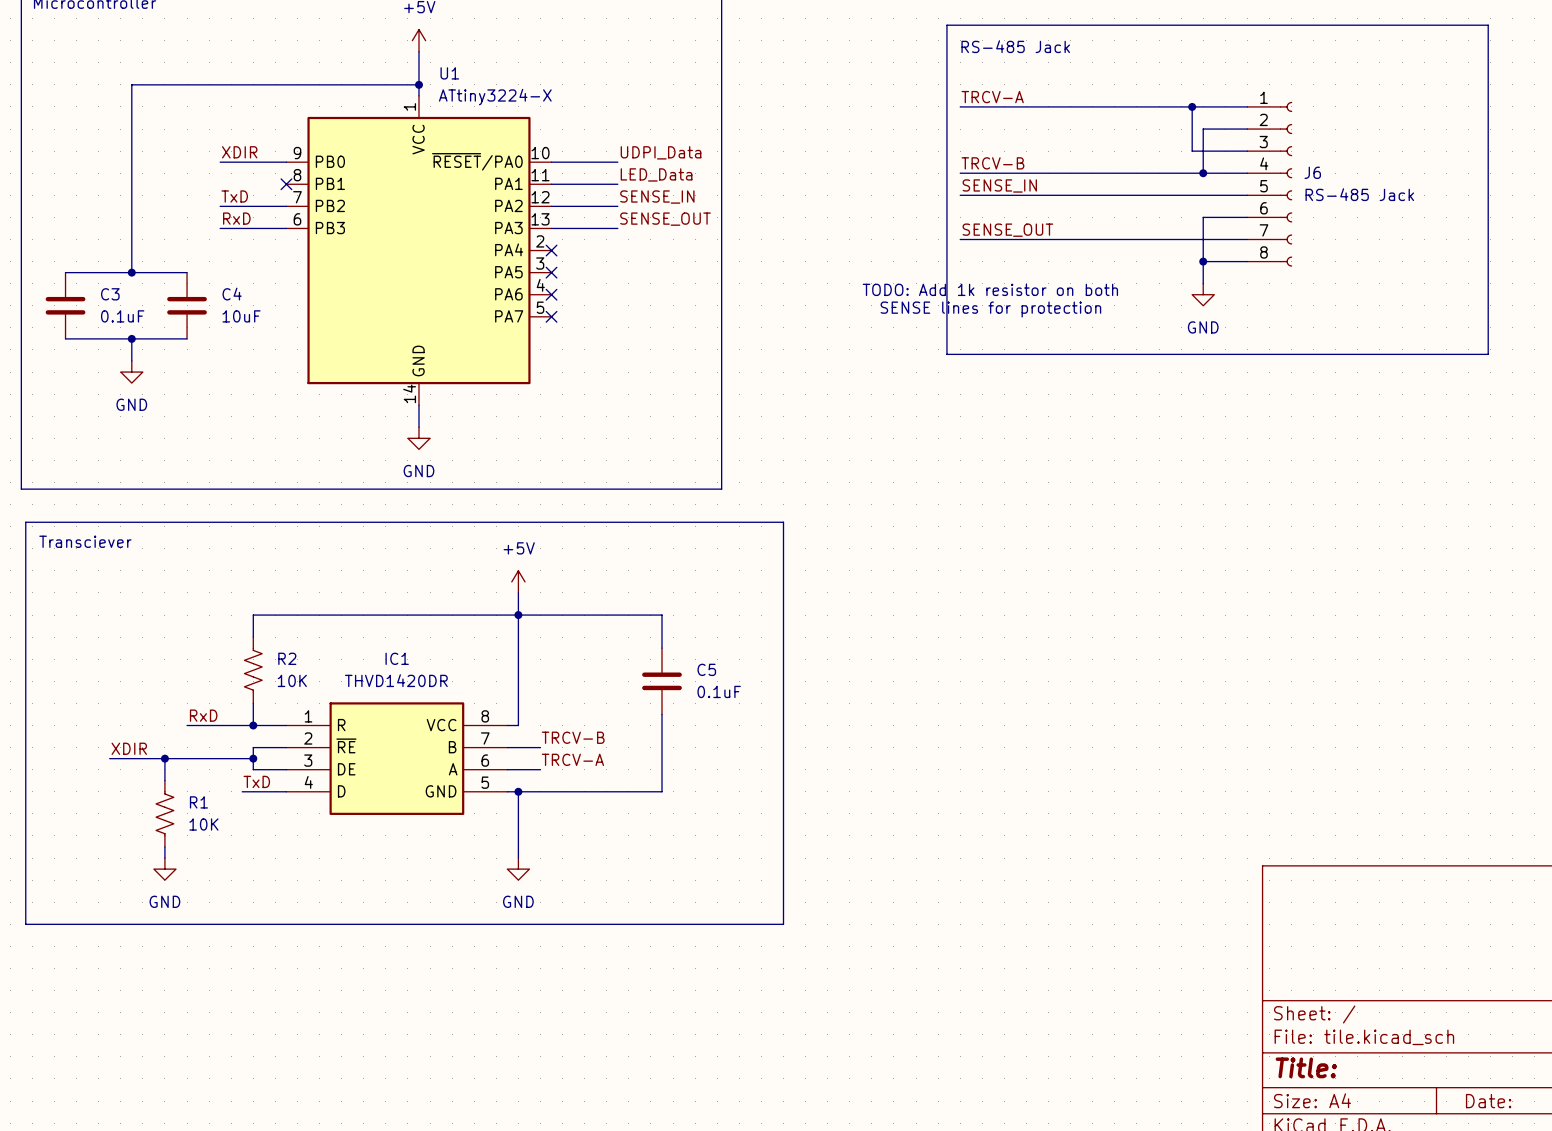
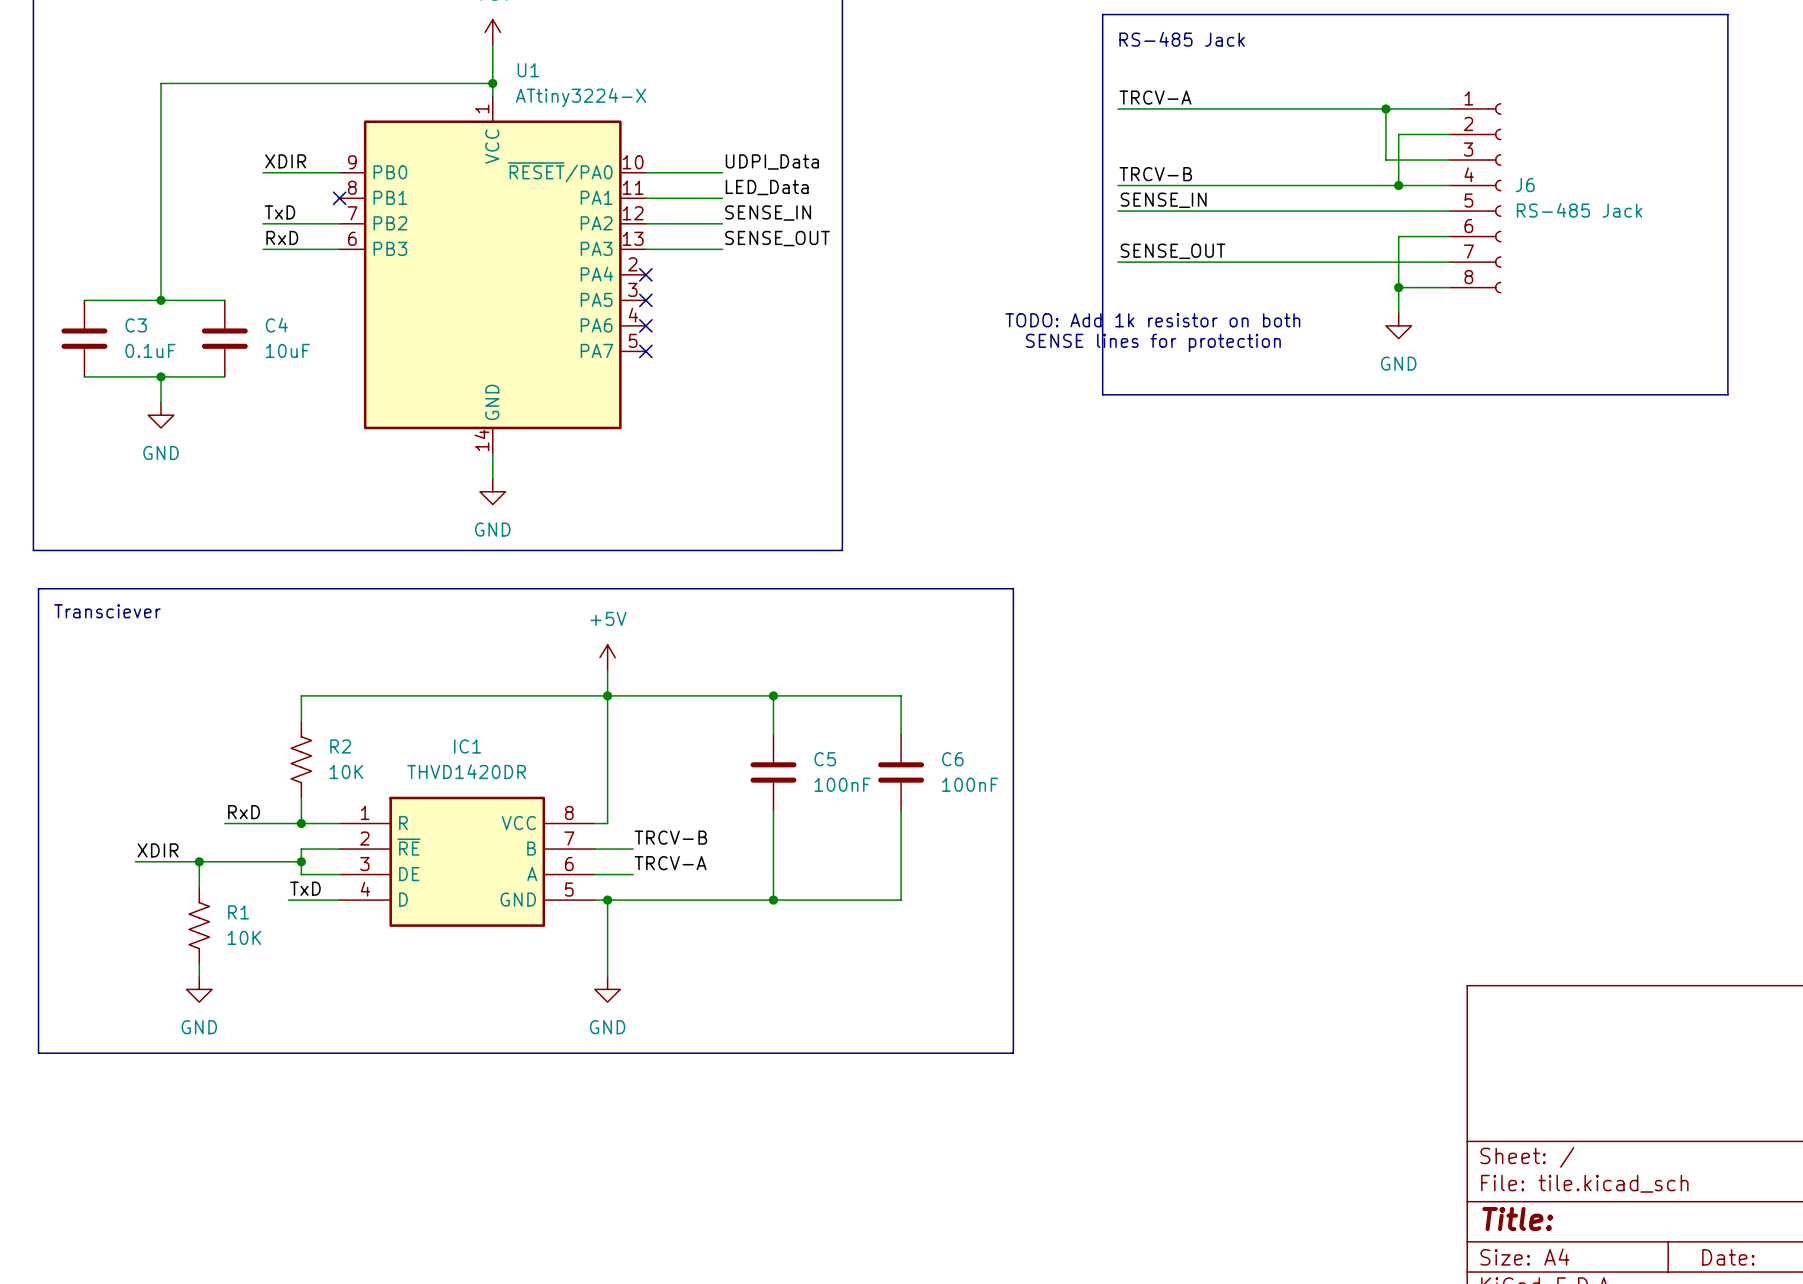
line: (783, 522) (783, 924) -> (913, 588) (1013, 588) (1013, 1053) (913, 1053)
wire: none -> (773, 695) (901, 695) (901, 734)
junction: none -> (773, 695)
C6: none -> 100nF (901, 772)
C5 value: 0.1uF (719, 691) -> 100nF (842, 784)
wire: none -> (901, 810) (901, 900) (773, 900)
junction: none -> (773, 900)

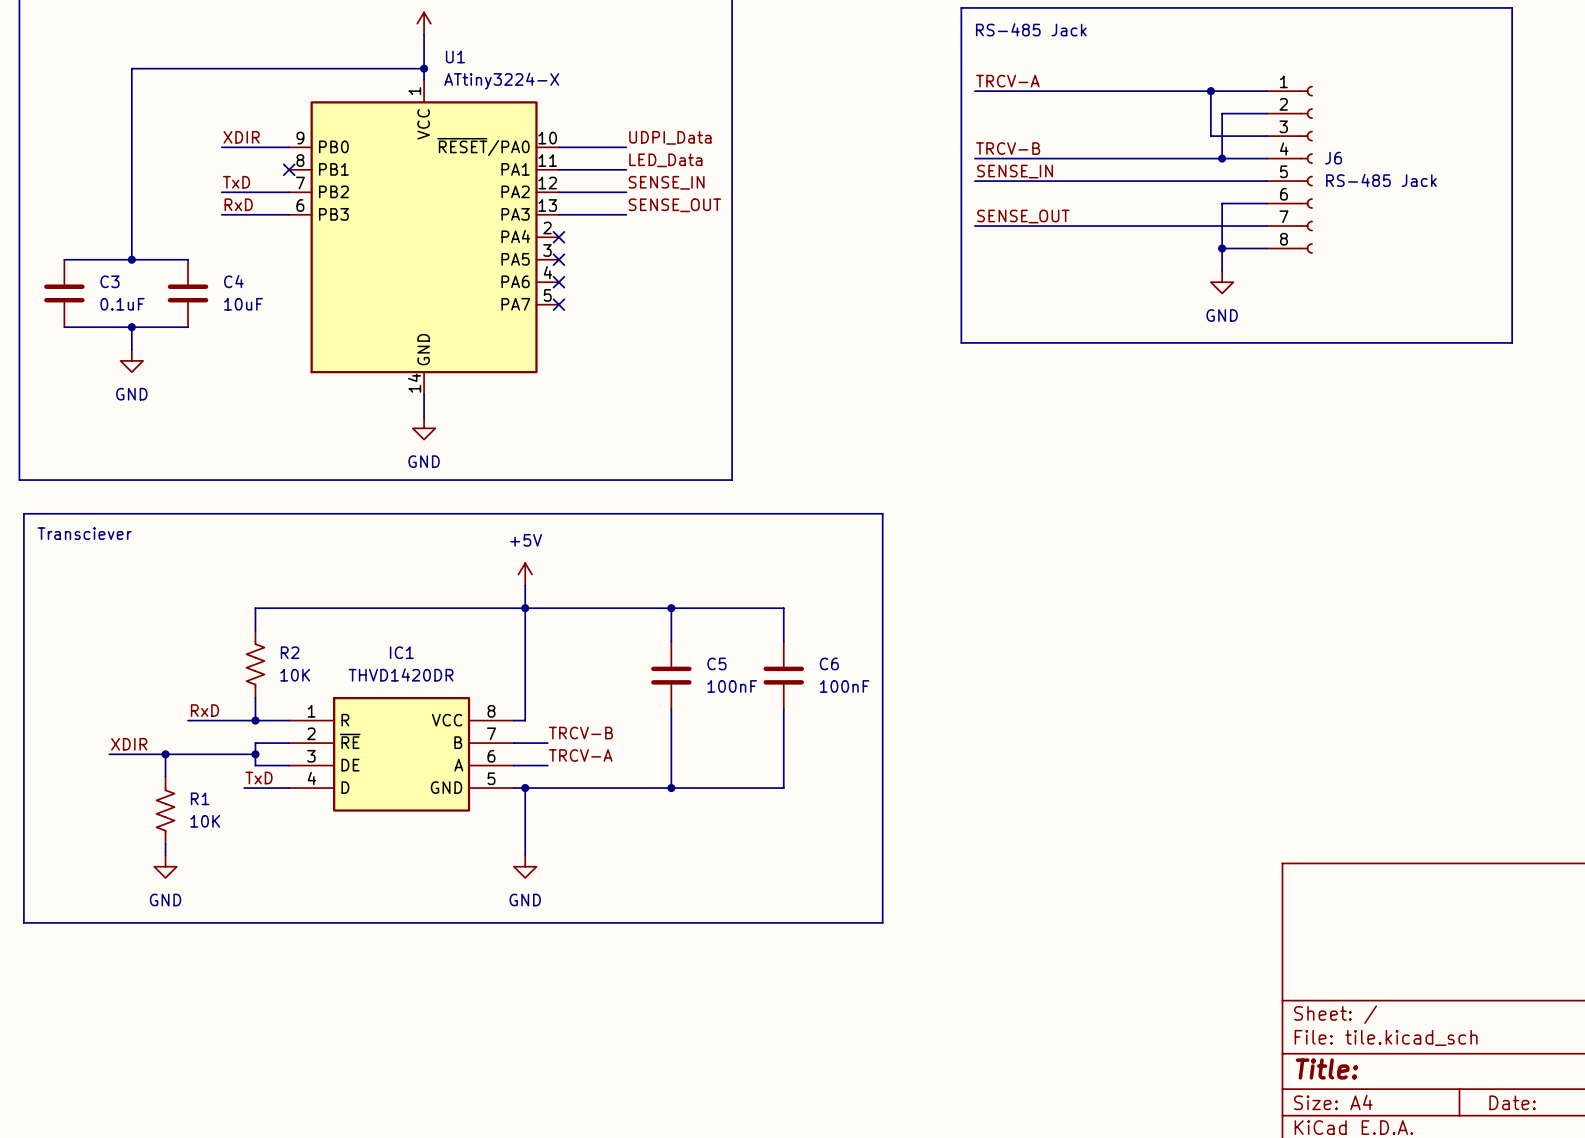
text: TODO: Add 1k resistor on both (1152, 320) -> none
text: SENSE lines for protection (1153, 342) -> none

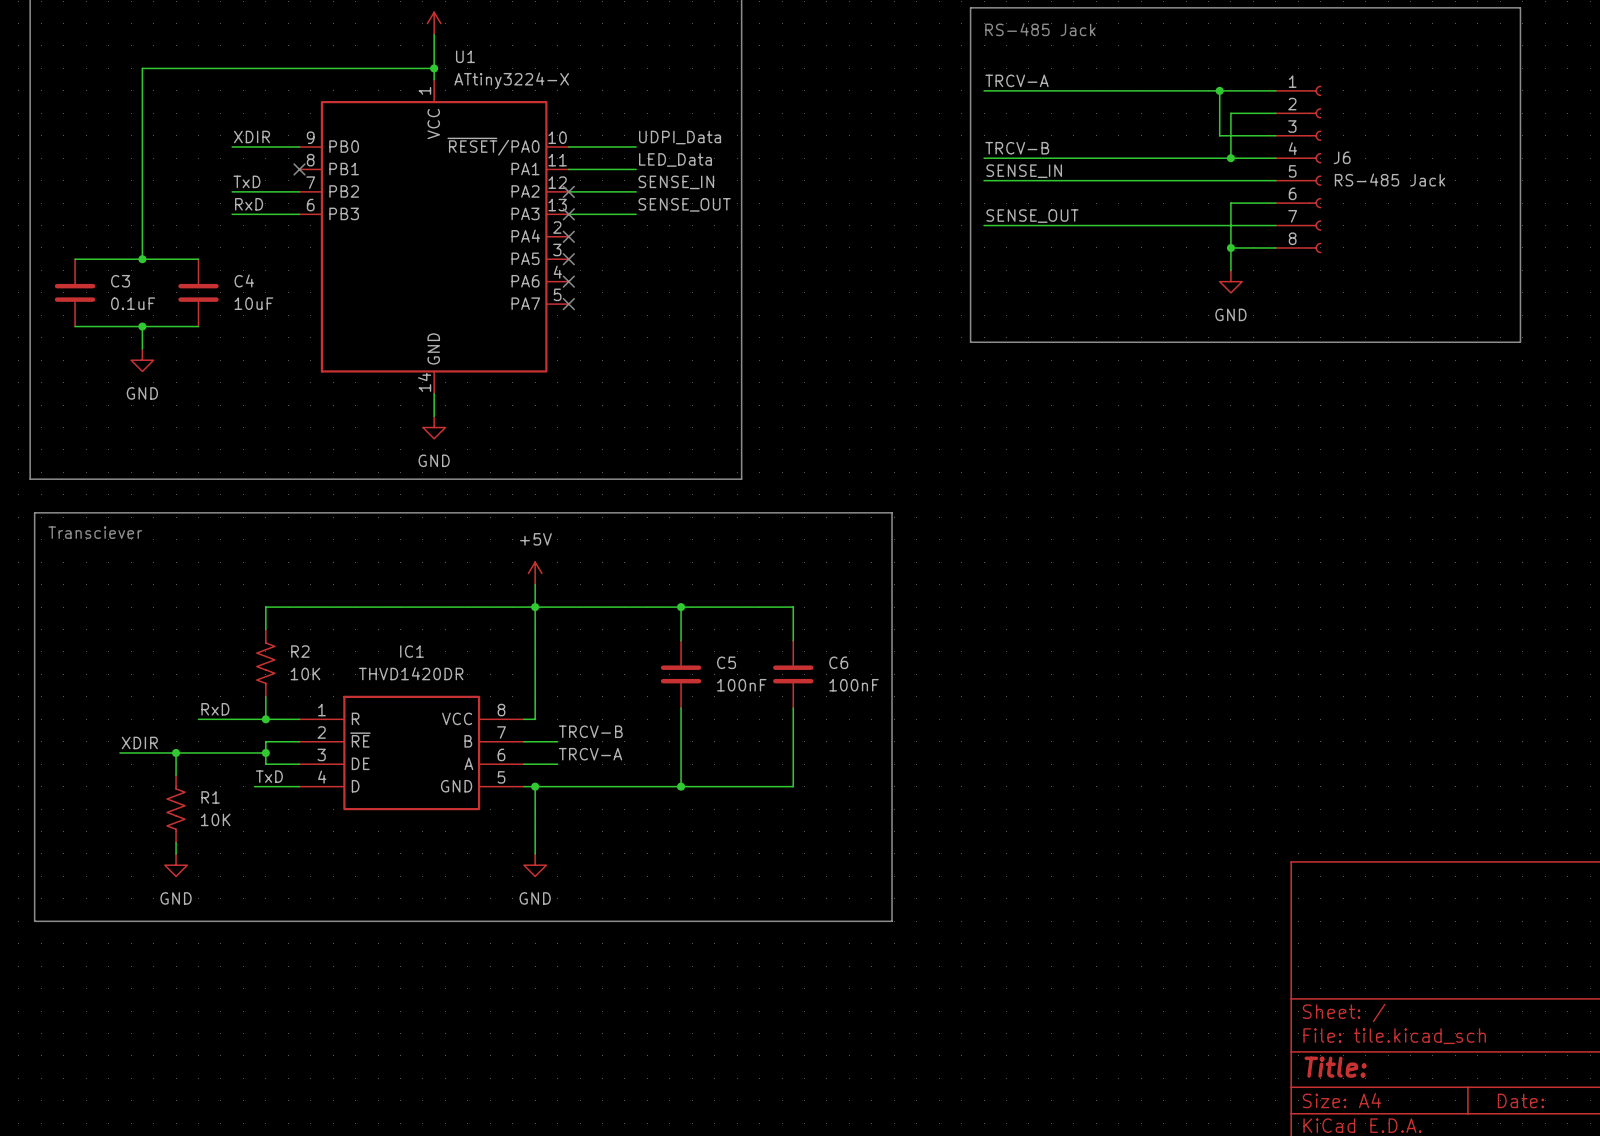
no-connect mark: none -> (568, 191)
no-connect mark: none -> (568, 214)

